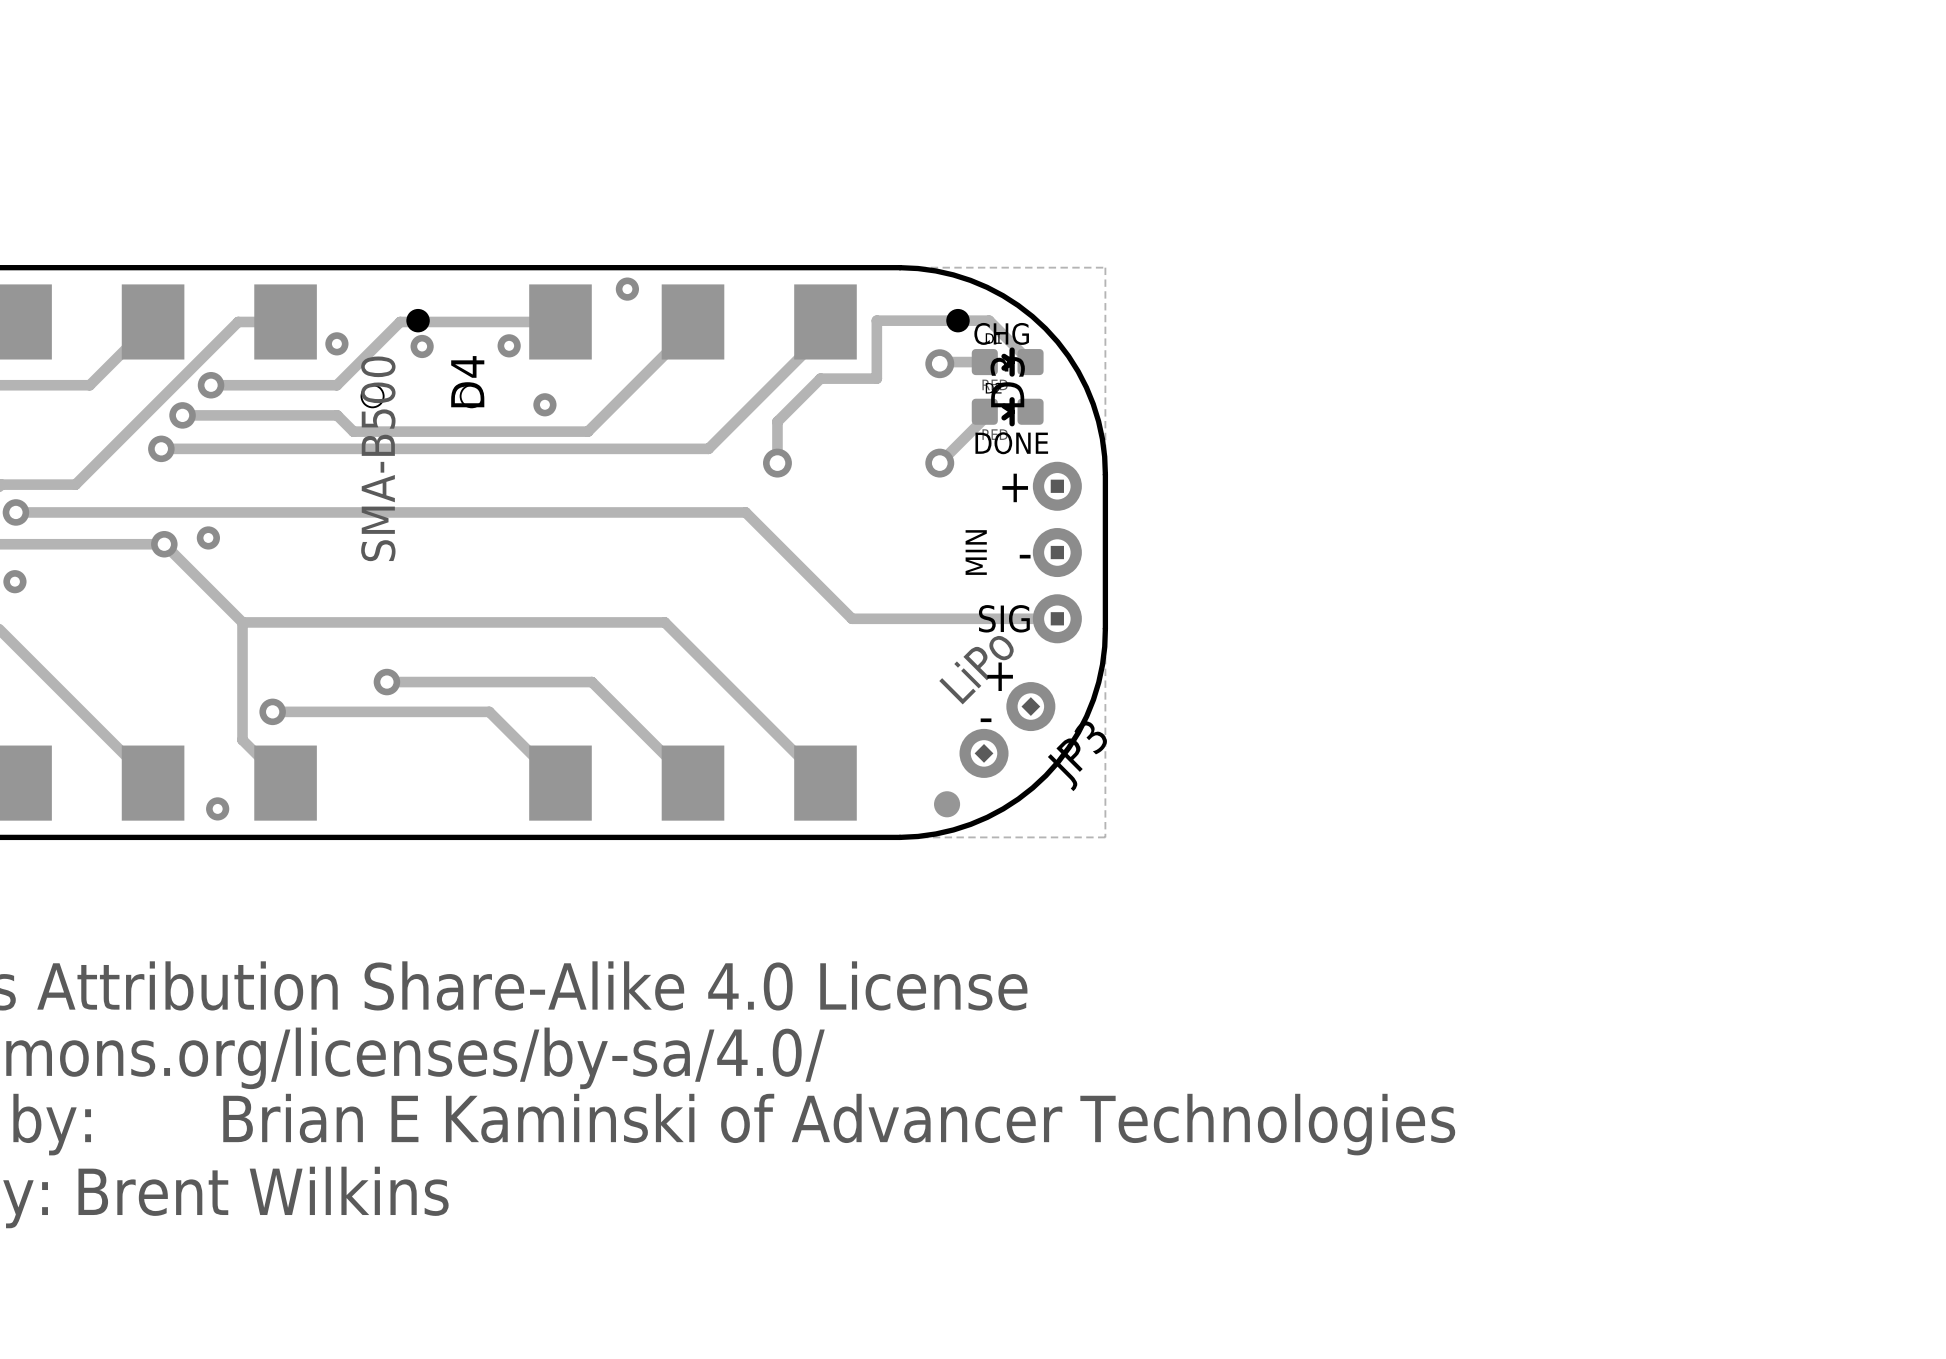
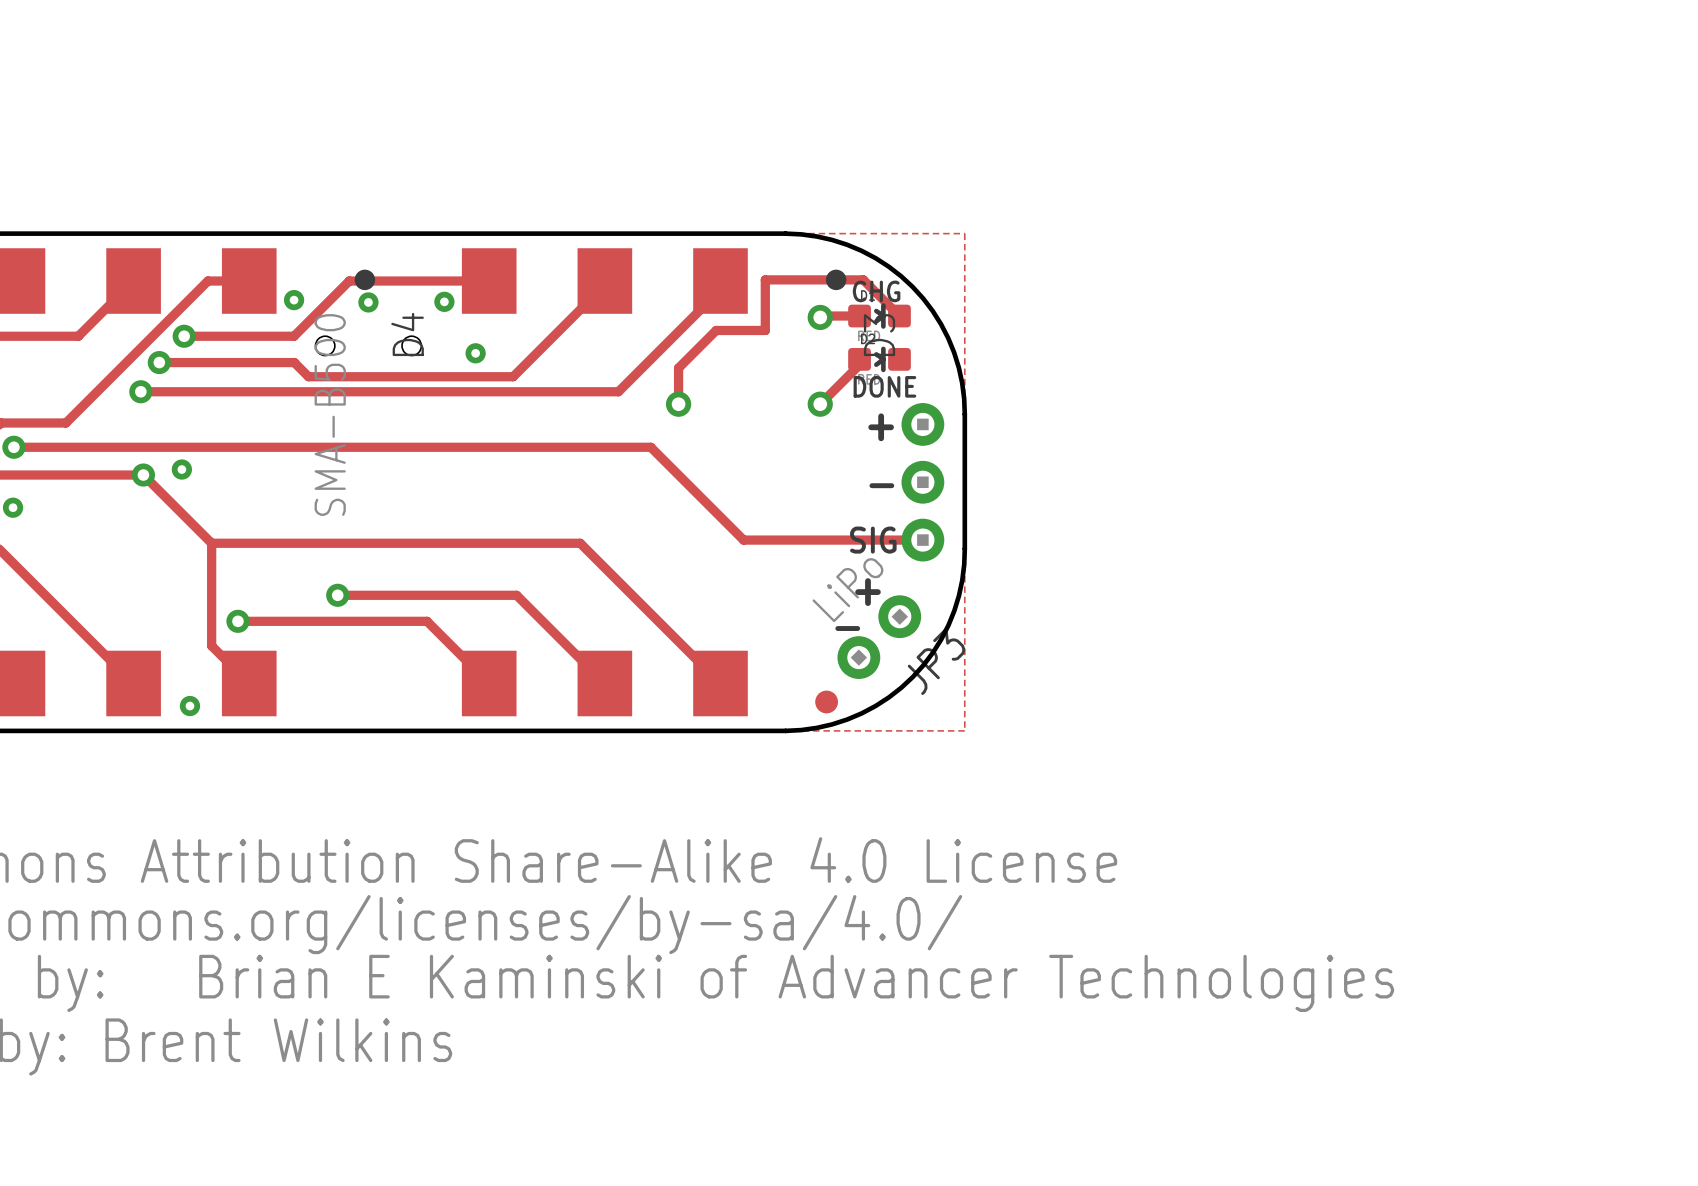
via: (627, 289) -> none
text: MIN (976, 552) -> none

